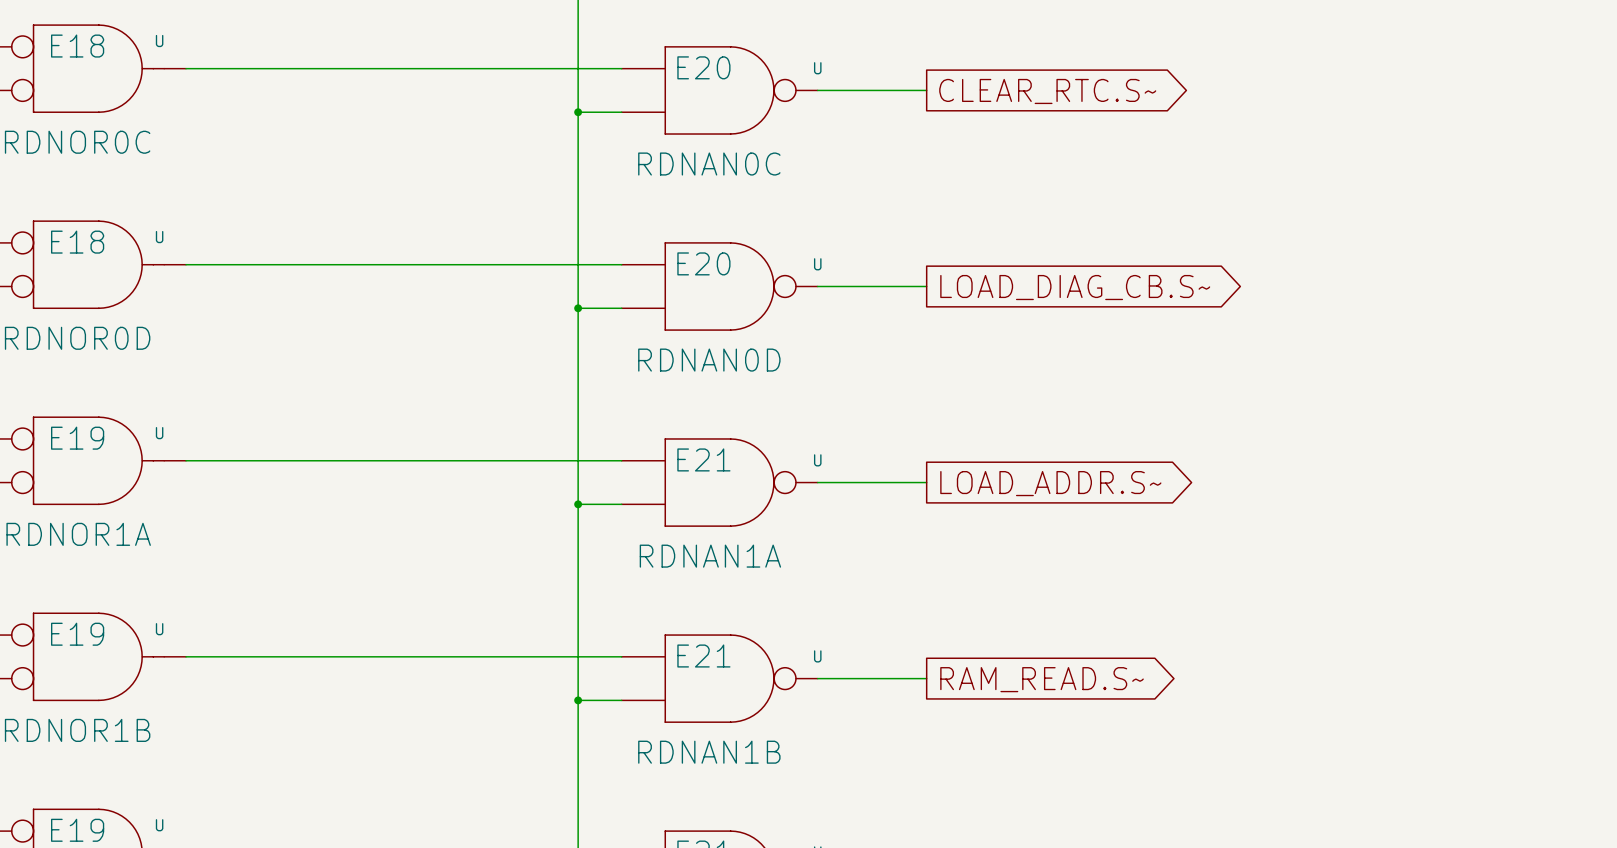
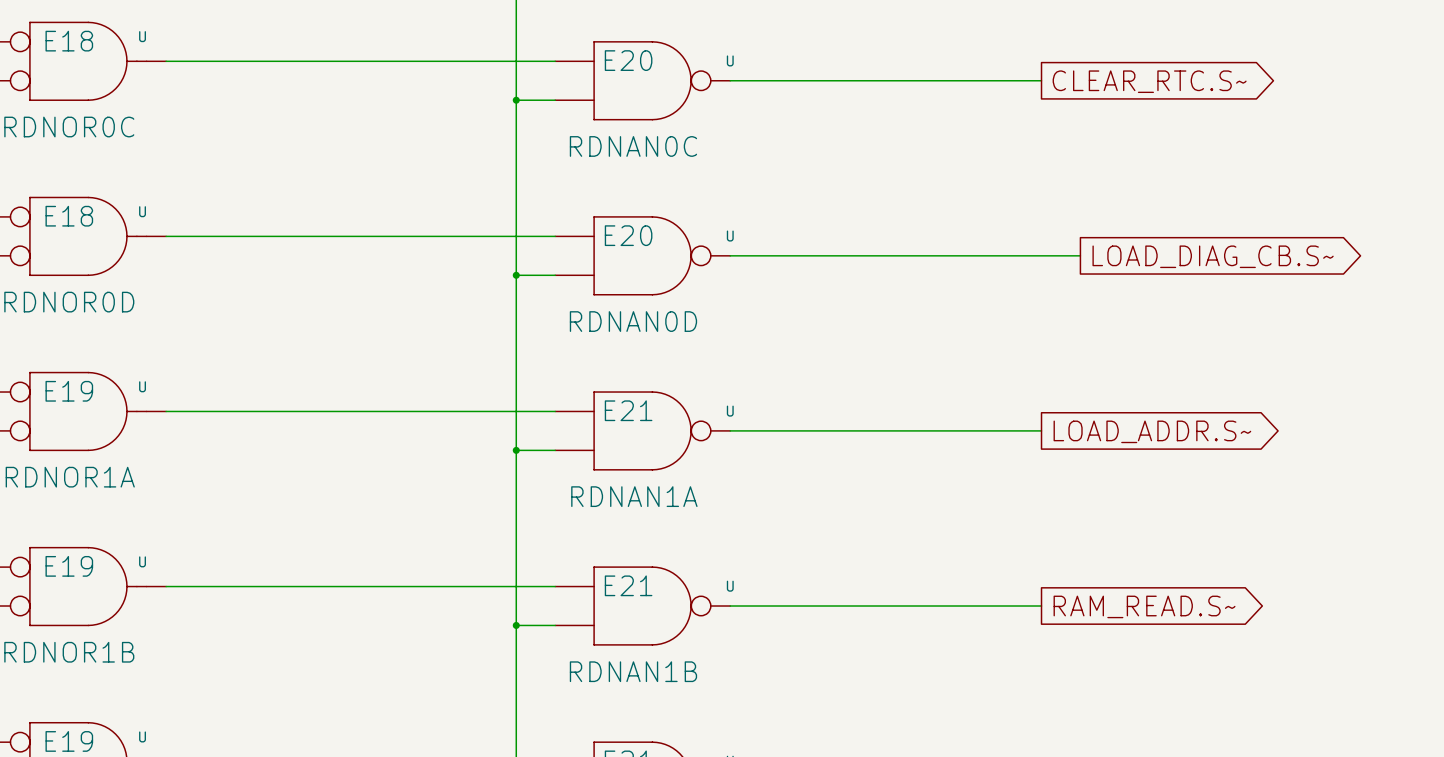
wire: none -> (827, 80) (1041, 80)
global label: CLEAR_RTC.S~ (1047, 91) -> none
global label: none -> CLEAR_RTC.S~ (1149, 81)
wire: none -> (827, 255) (1080, 255)
global label: LOAD_DIAG_CB.S~ (1075, 287) -> none
global label: none -> LOAD_DIAG_CB.S~ (1213, 256)
wire: none -> (827, 430) (1041, 430)
global label: LOAD_ADDR.S~ (1050, 483) -> none
global label: none -> LOAD_ADDR.S~ (1152, 431)
wire: none -> (827, 606) (1041, 606)
global label: RAM_READ.S~ (1042, 679) -> none
global label: none -> RAM_READ.S~ (1144, 606)

